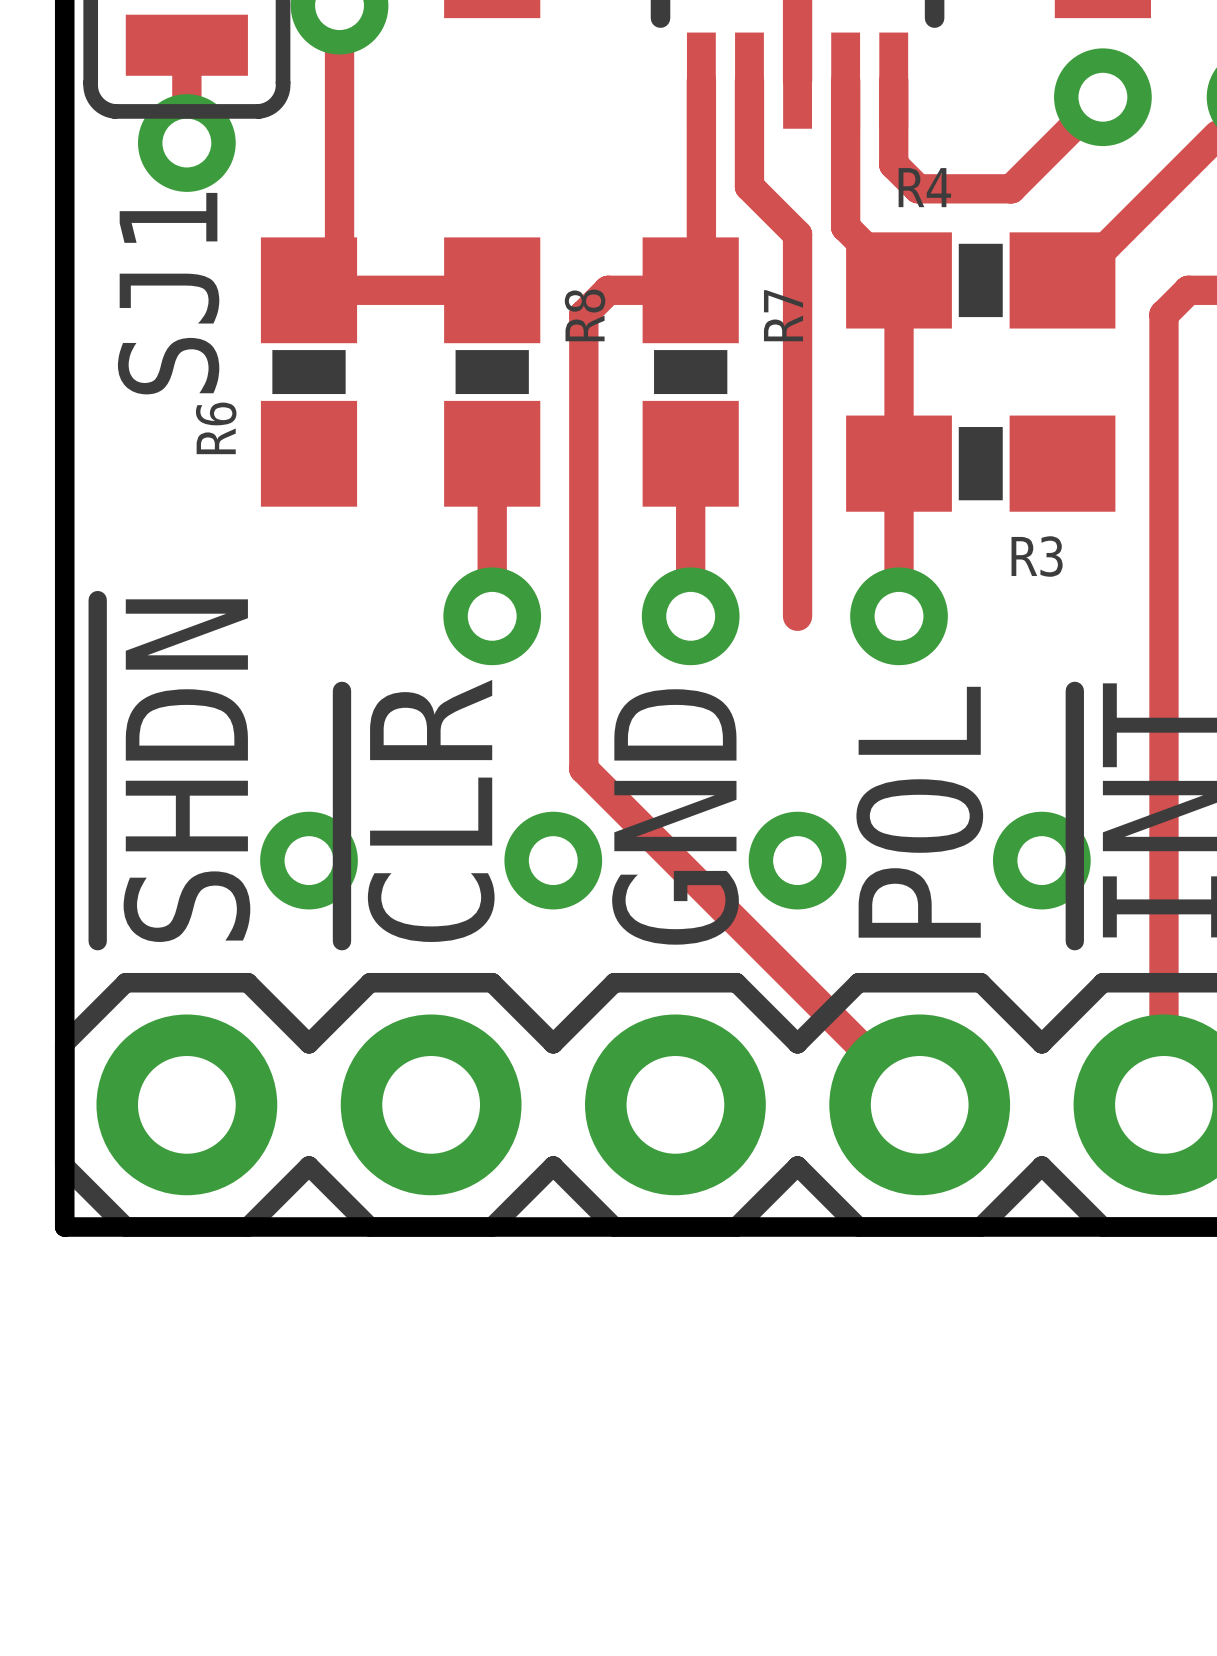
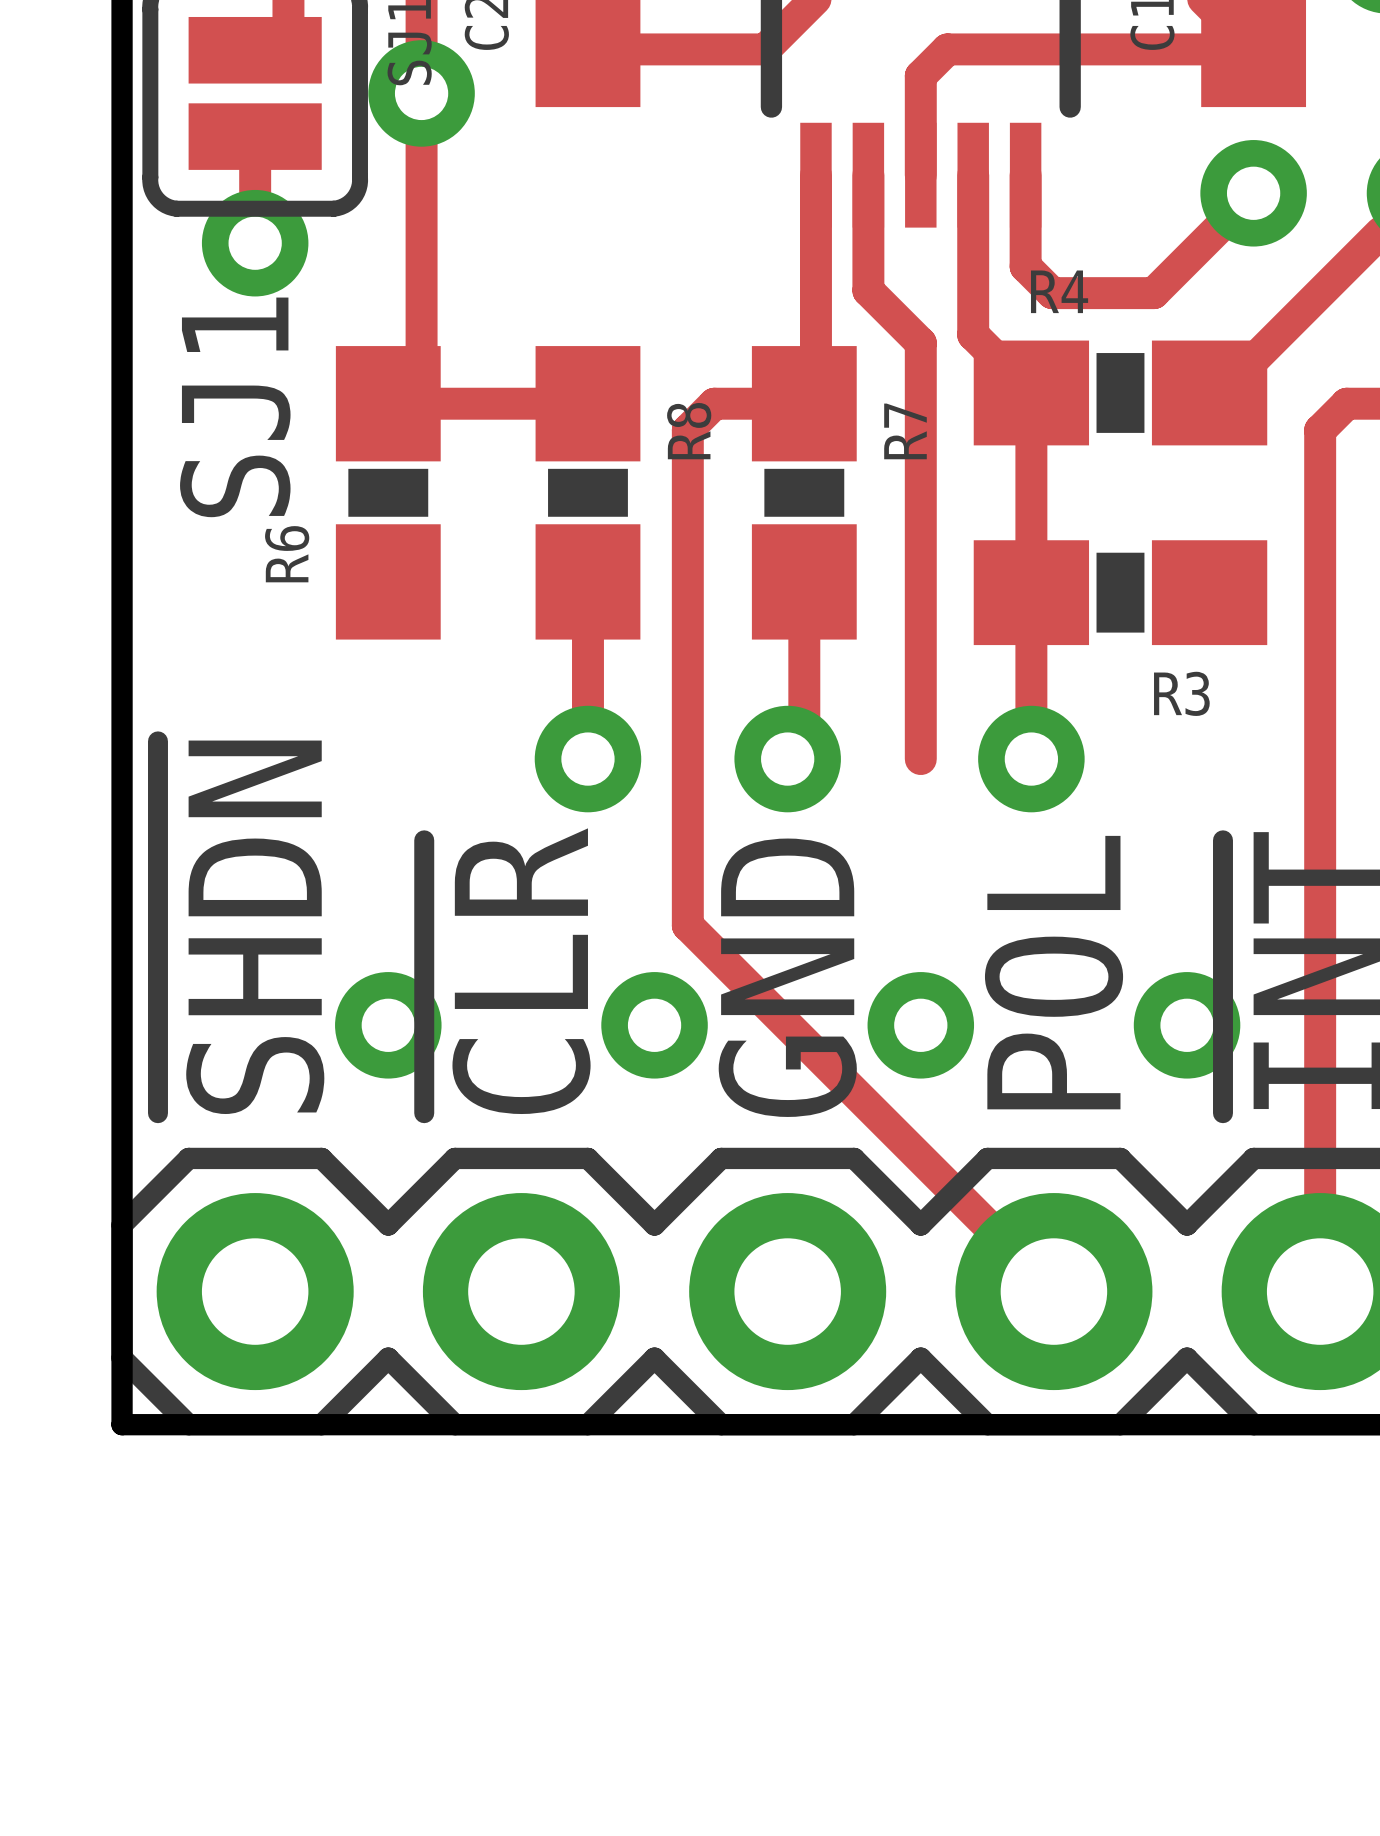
via position: (690, 616) -> (787, 759)

